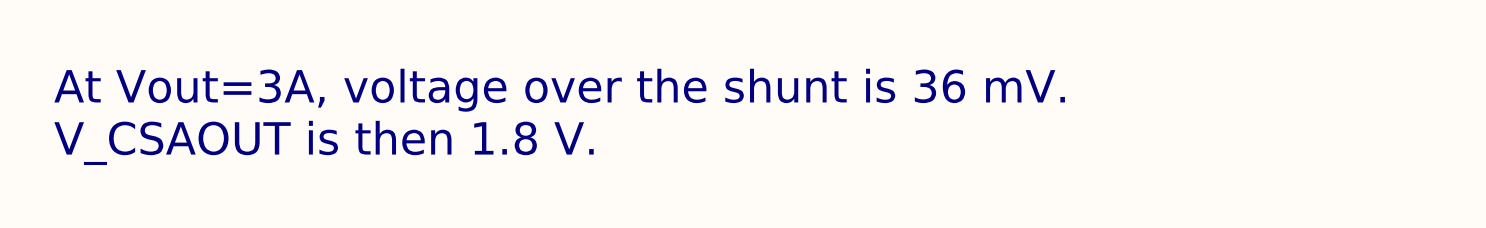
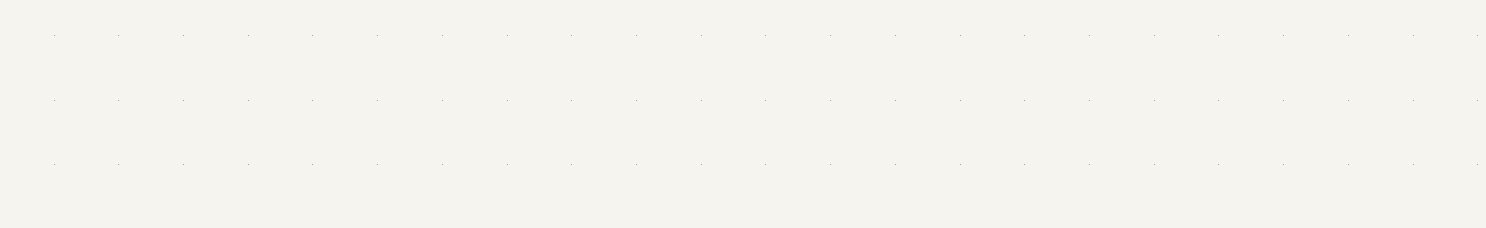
text: At Vout=3A, voltage over the shunt is 36 mV. (559, 90) -> none
text: V_CSAOUT is then 1.8 V. (324, 142) -> none

